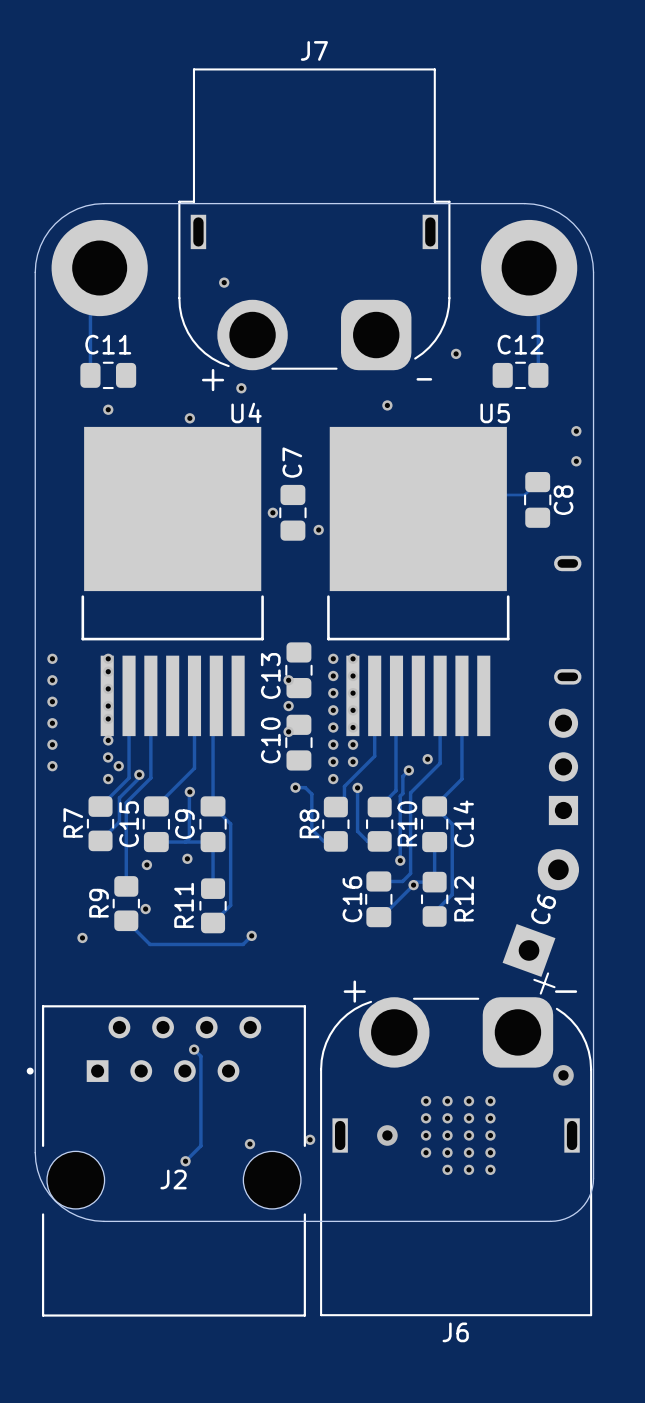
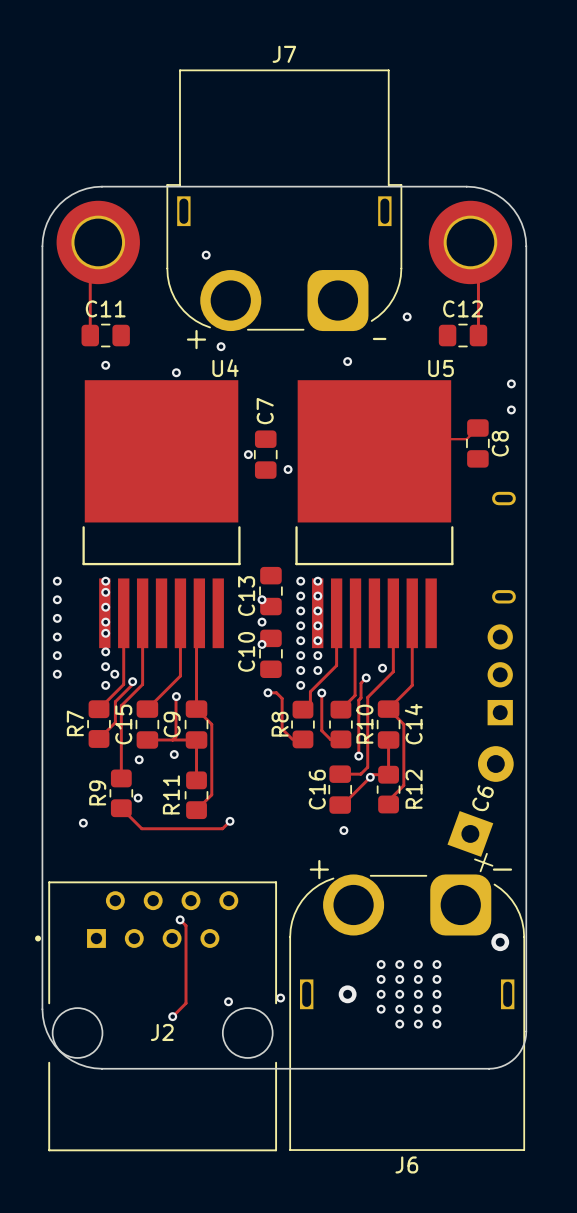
via: none -> (343, 830)

